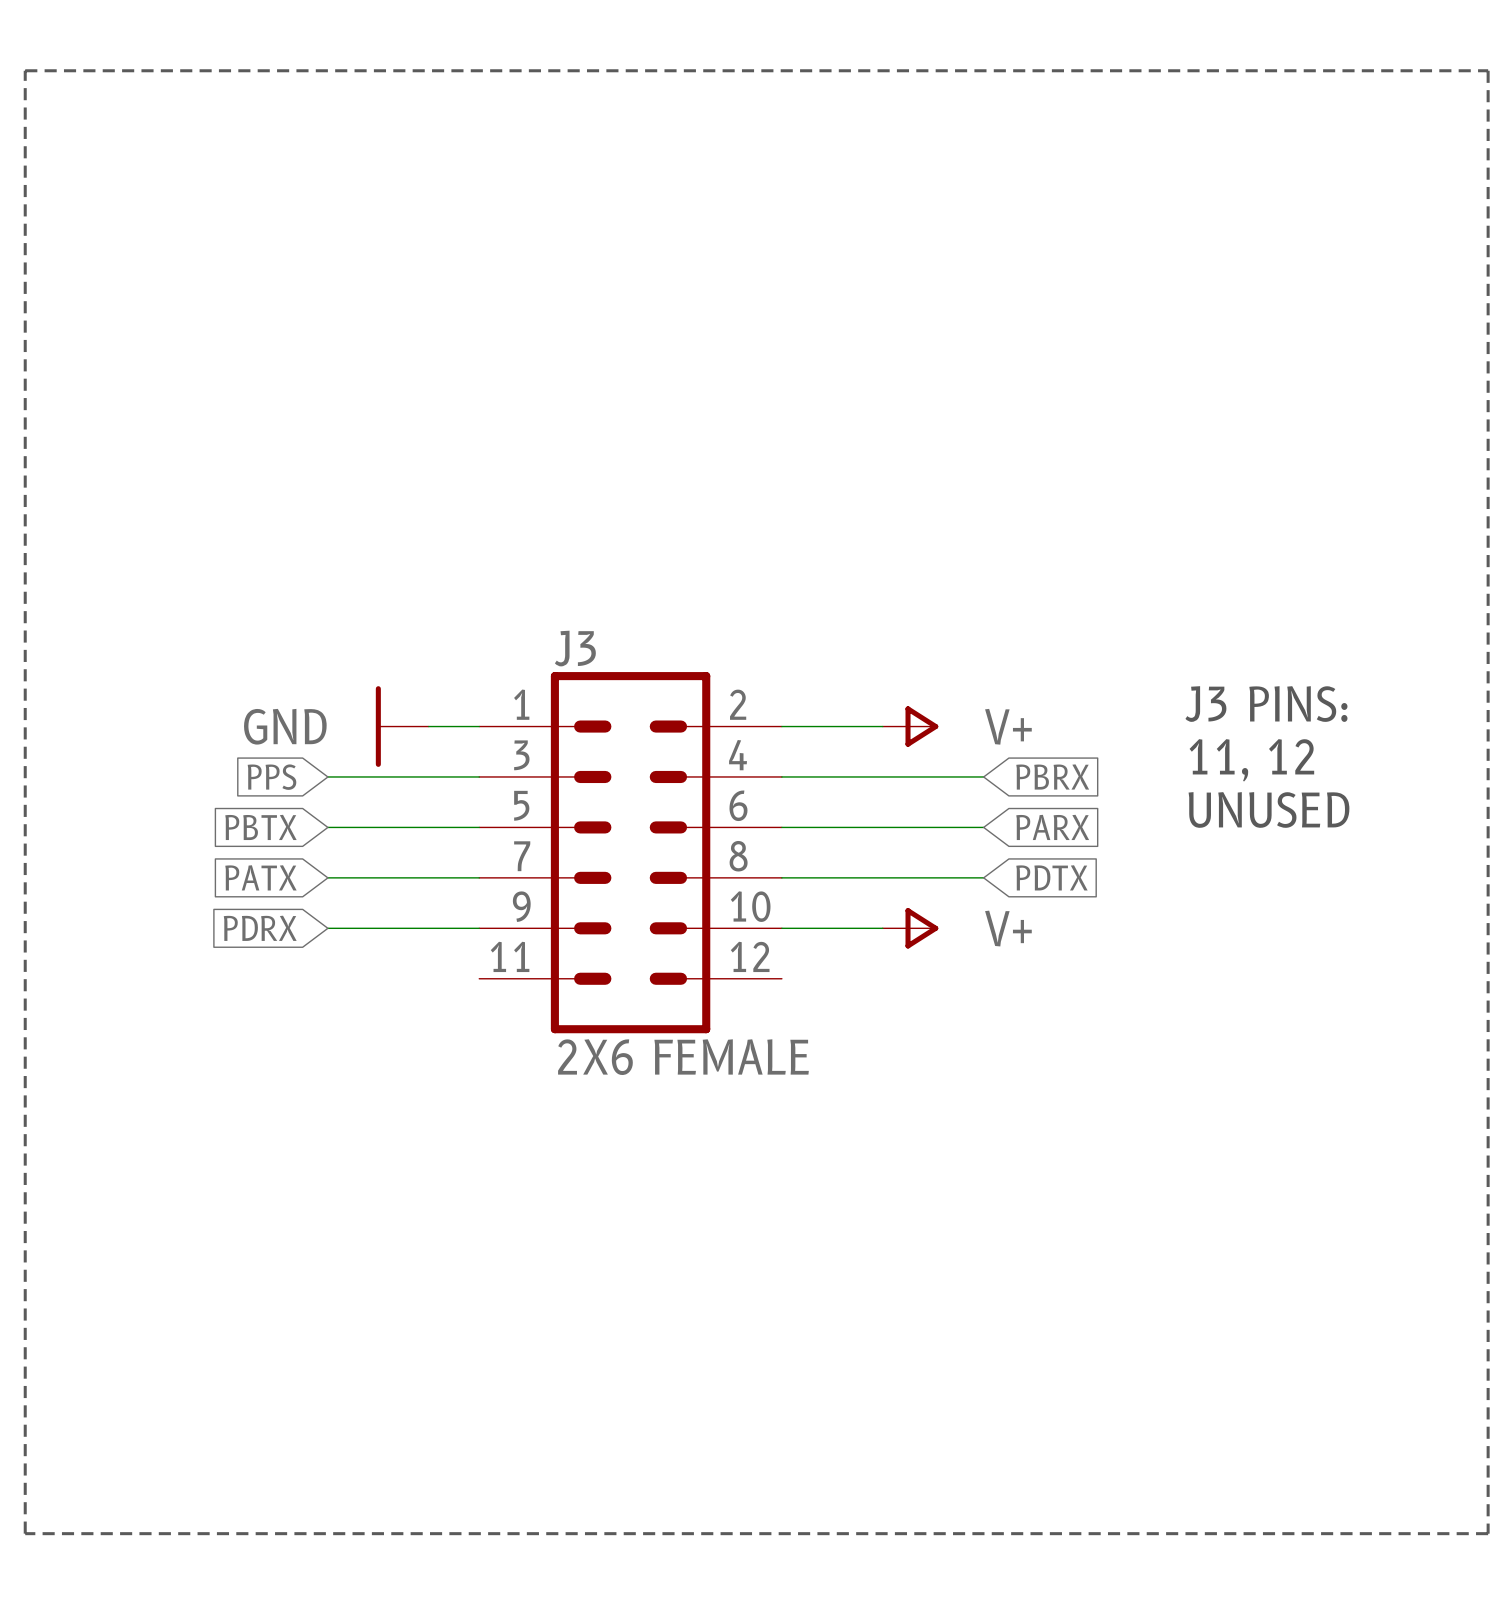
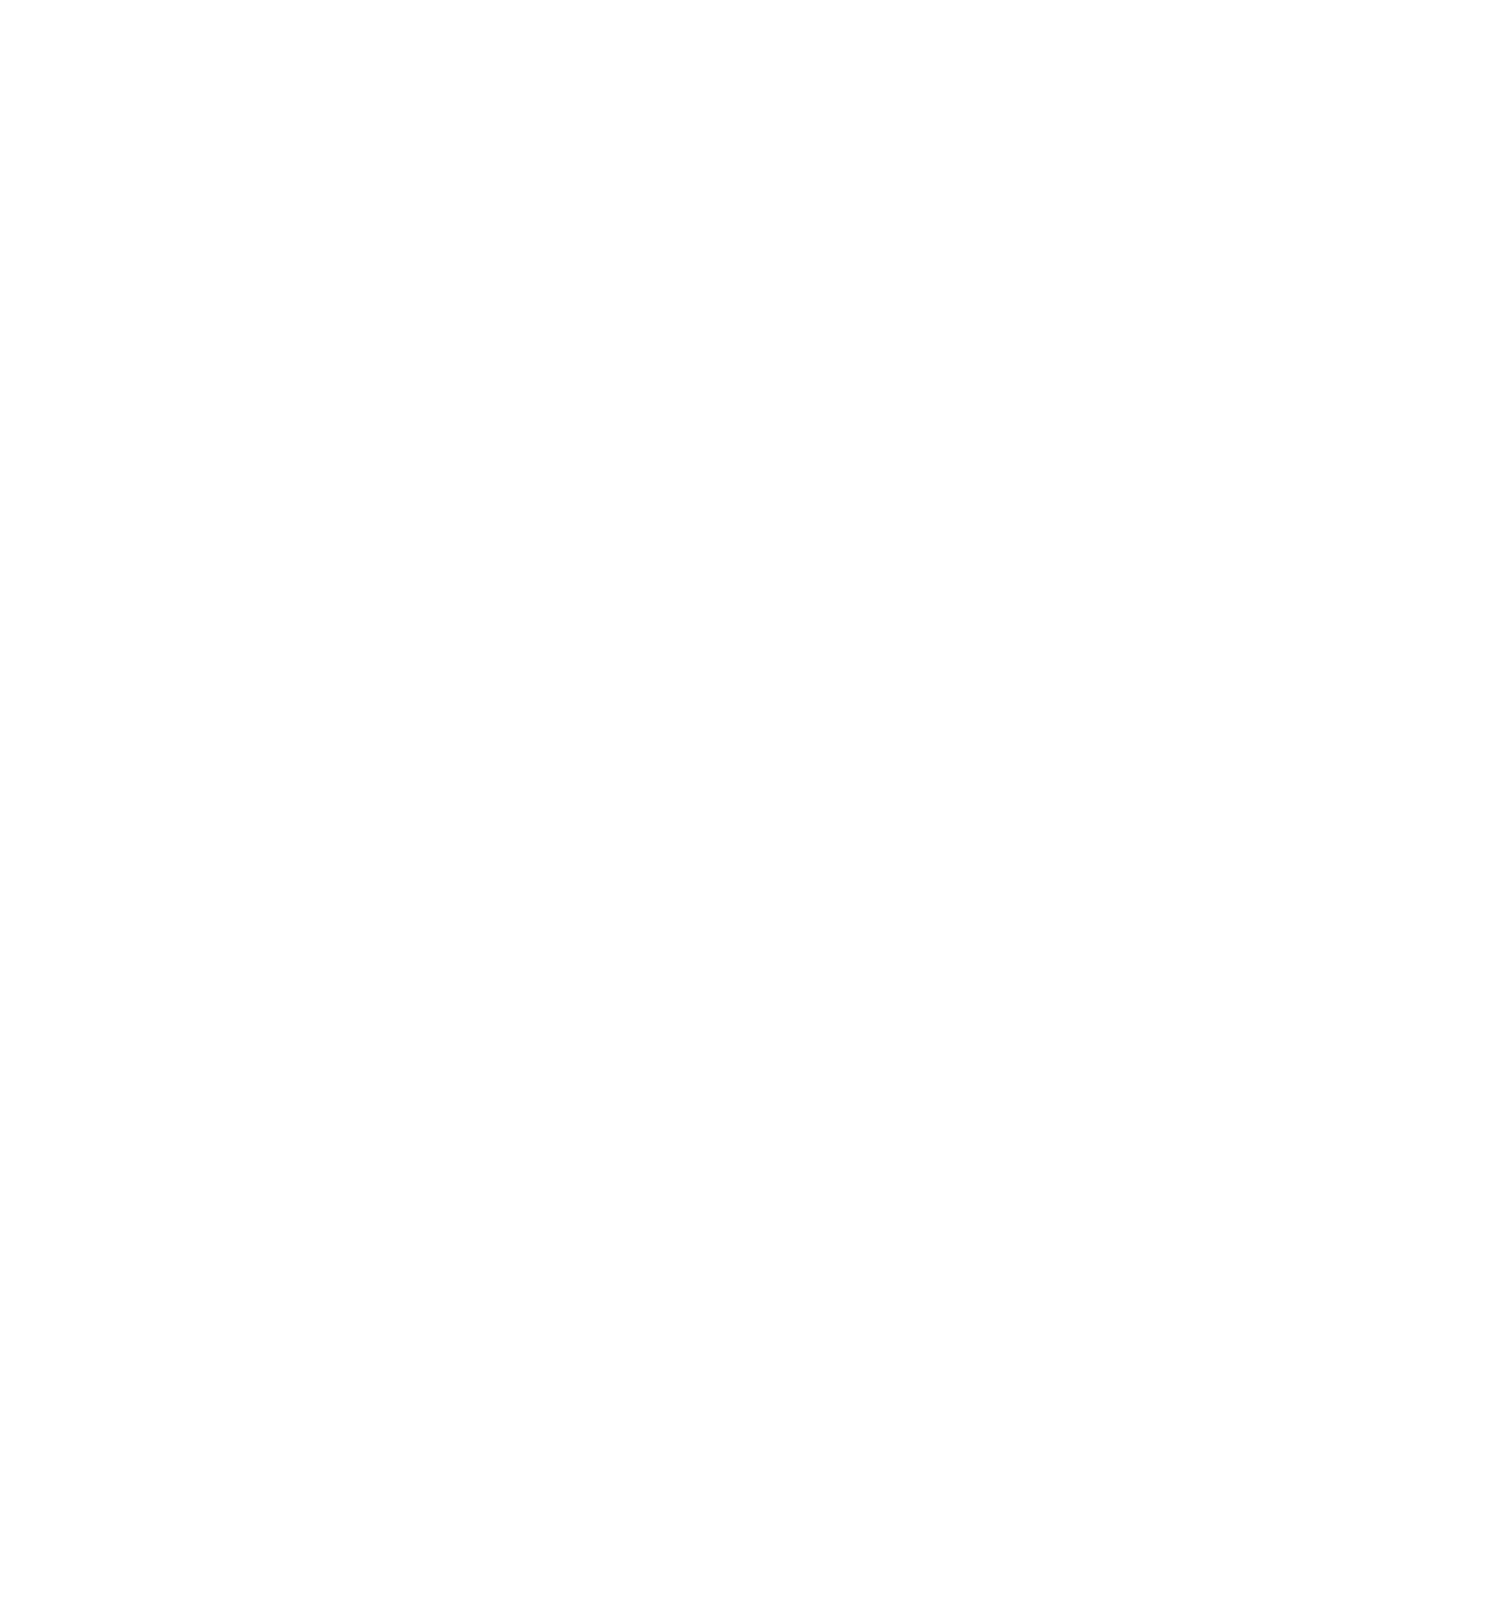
line: (25, 70) (1488, 70) (1488, 1533) (25, 1533) (25, 70) -> none
text: J3 PINS: (1266, 704) -> none
power symbol: GND (402, 726) -> none
wire: (428, 726) (479, 726) -> none
wire: (781, 726) (882, 726) -> none
power symbol: V+ (910, 726) -> none
text: 11, 12 (1251, 760) -> none
wire: (327, 776) (479, 776) -> none
wire: (781, 776) (983, 776) -> none
global label: PBRX (1052, 776) -> none
global label: PPS (271, 777) -> none
text: UNUSED (1268, 809) -> none
global label: PBTX (260, 827) -> none
wire: (327, 827) (479, 827) -> none
wire: (781, 827) (983, 827) -> none
global label: PARX (1052, 827) -> none
J3: 2X6 FEMALE (630, 852) -> none
global label: PATX (260, 877) -> none
wire: (327, 877) (479, 877) -> none
wire: (781, 877) (983, 877) -> none
global label: PDTX (1051, 877) -> none
global label: PDRX (260, 928) -> none
wire: (327, 928) (479, 928) -> none
wire: (781, 928) (882, 928) -> none
power symbol: V+ (910, 928) -> none

